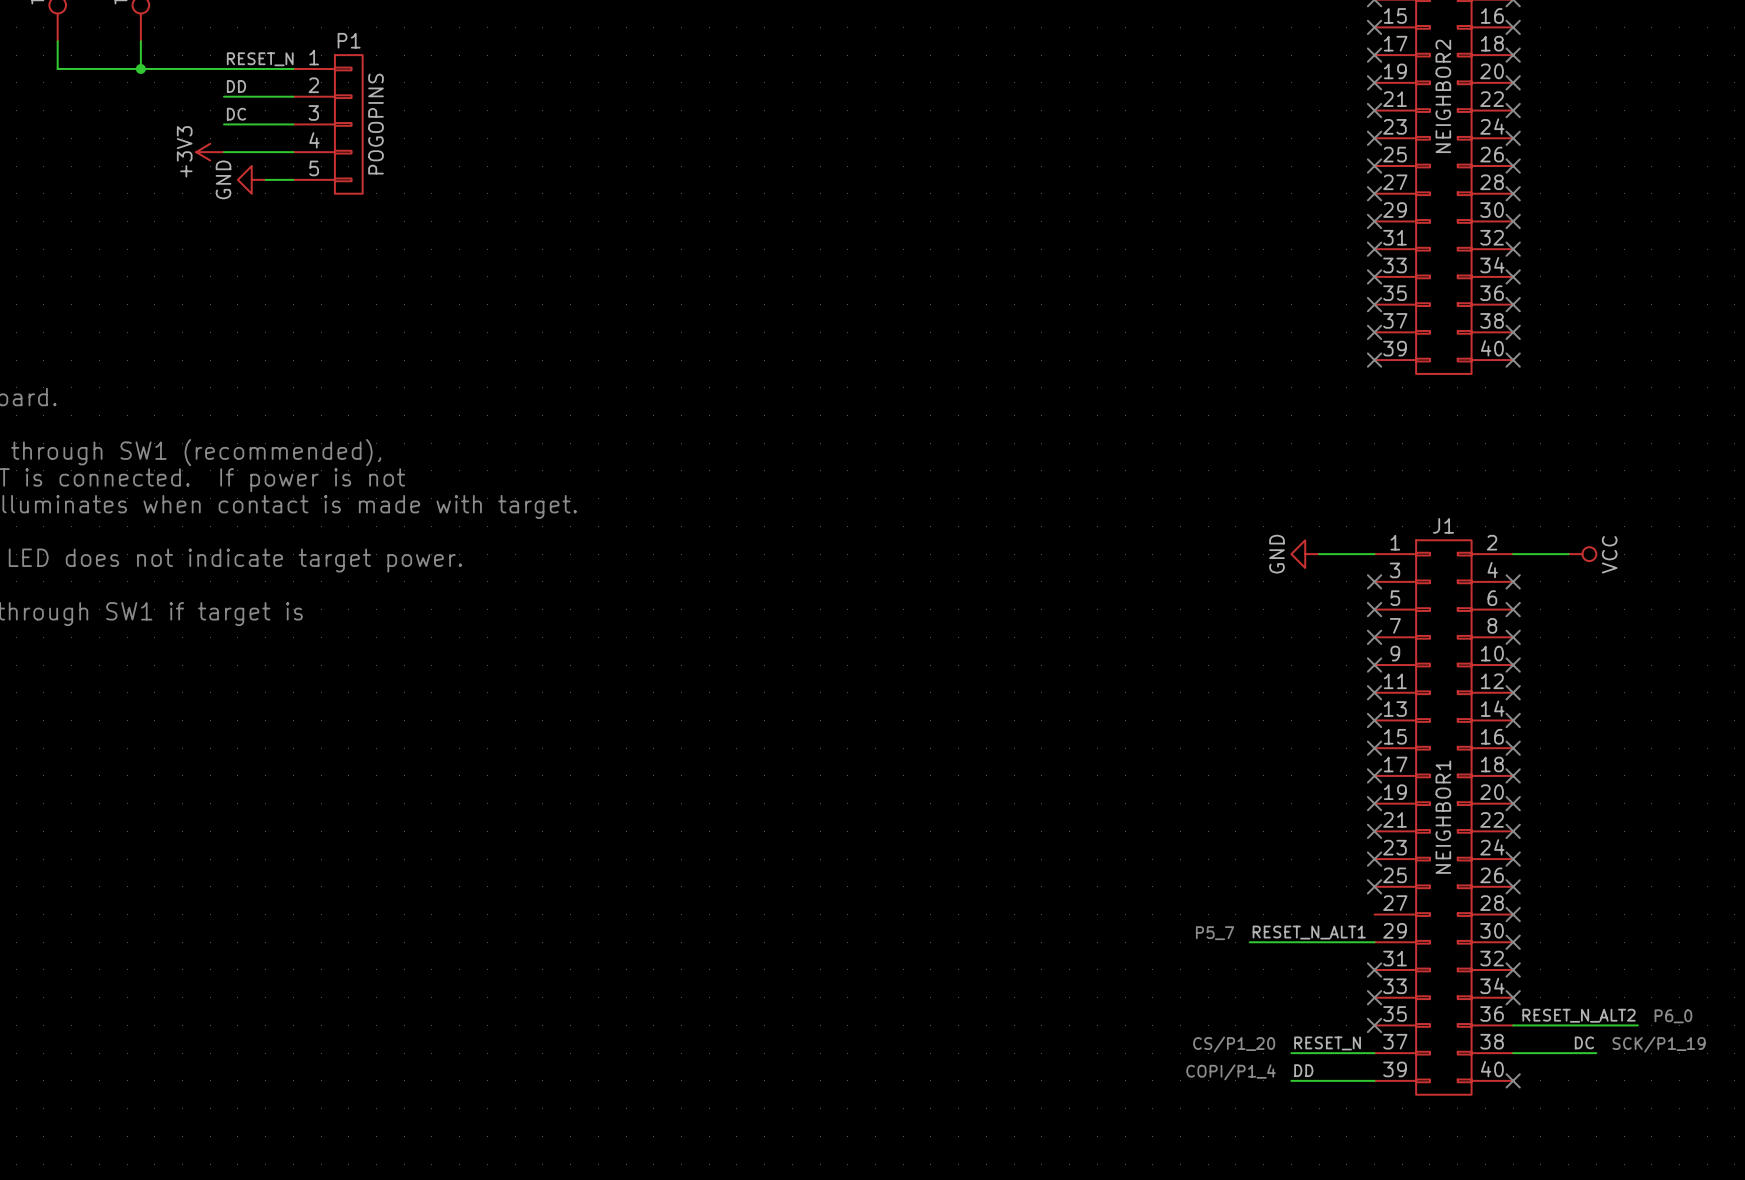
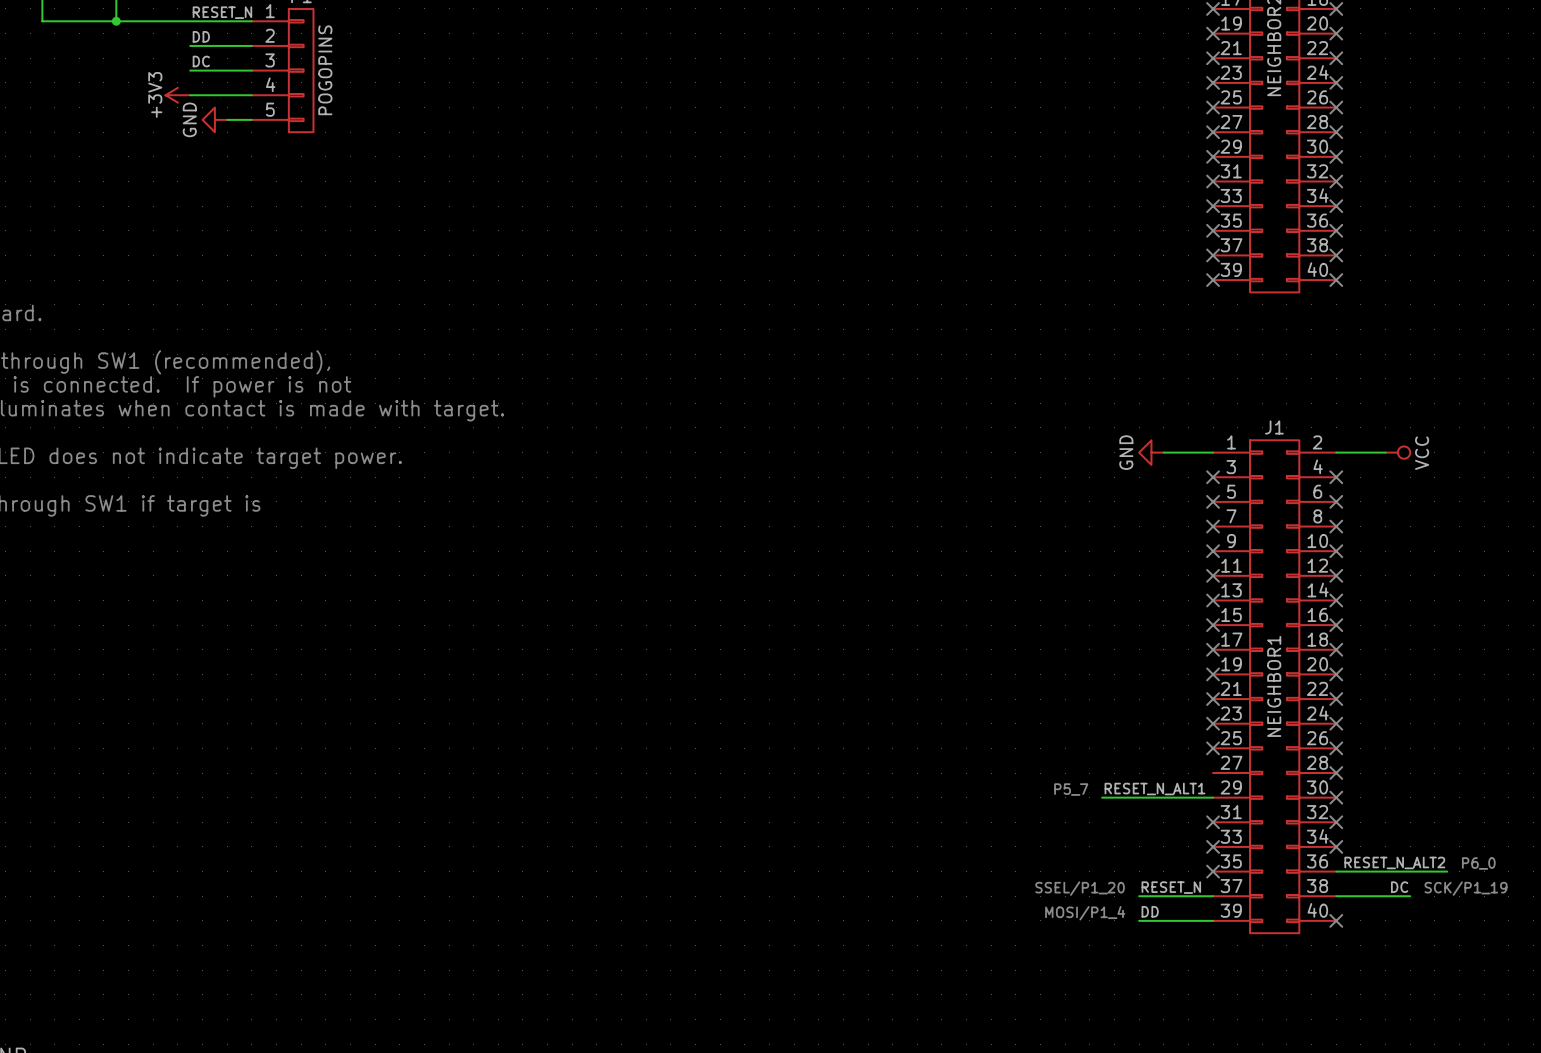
text: CS/P1_20 (1234, 1044) -> SSEL/P1_20 (1080, 888)
text: COPI/P1_4 (1231, 1072) -> MOSI/P1_4 (1085, 913)

